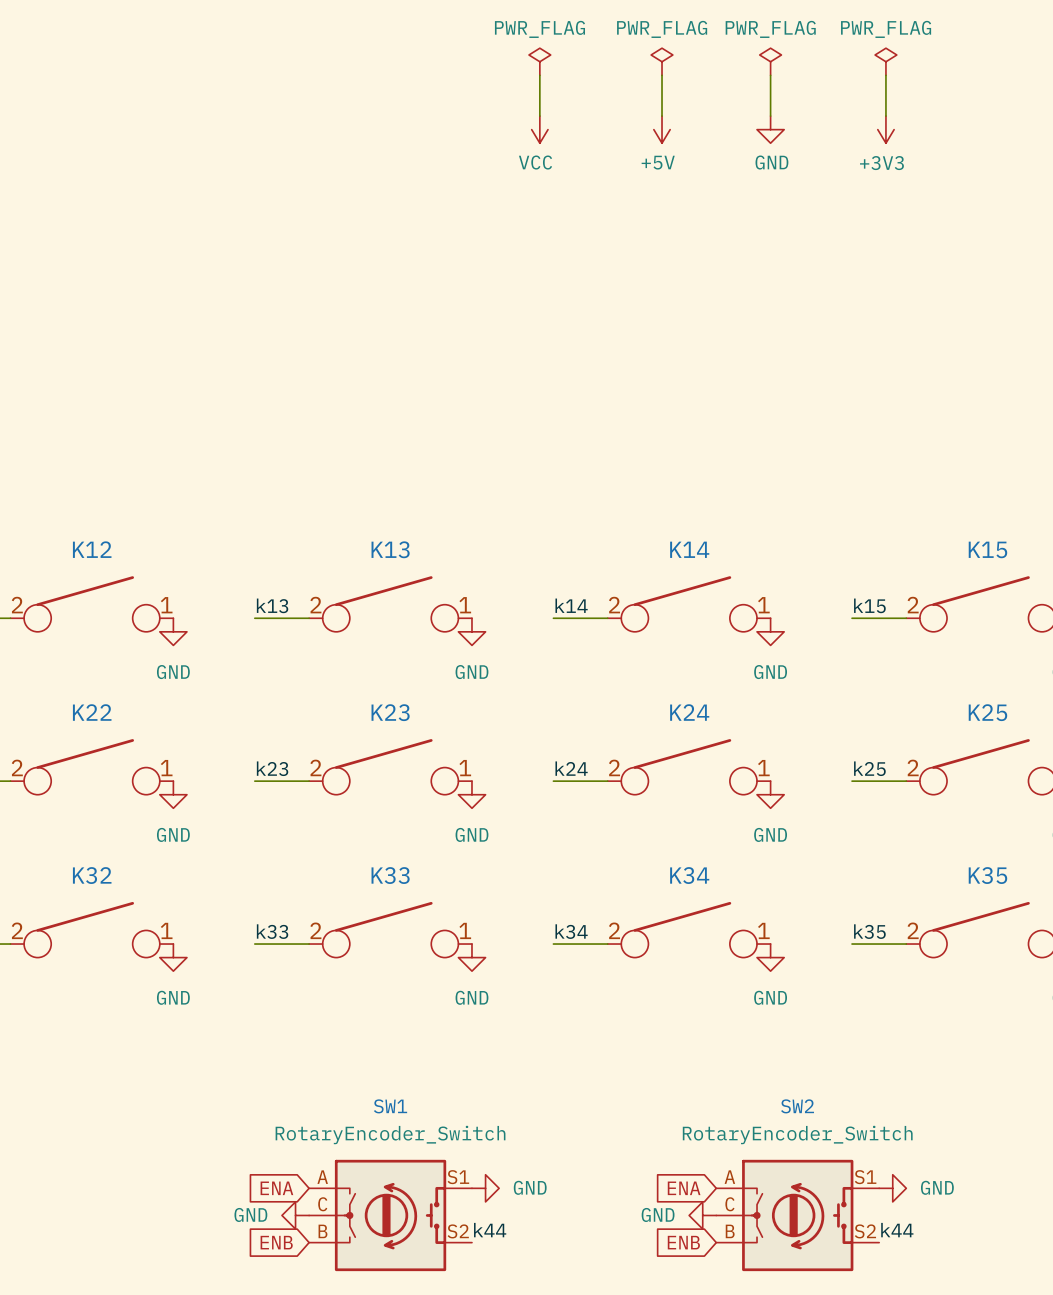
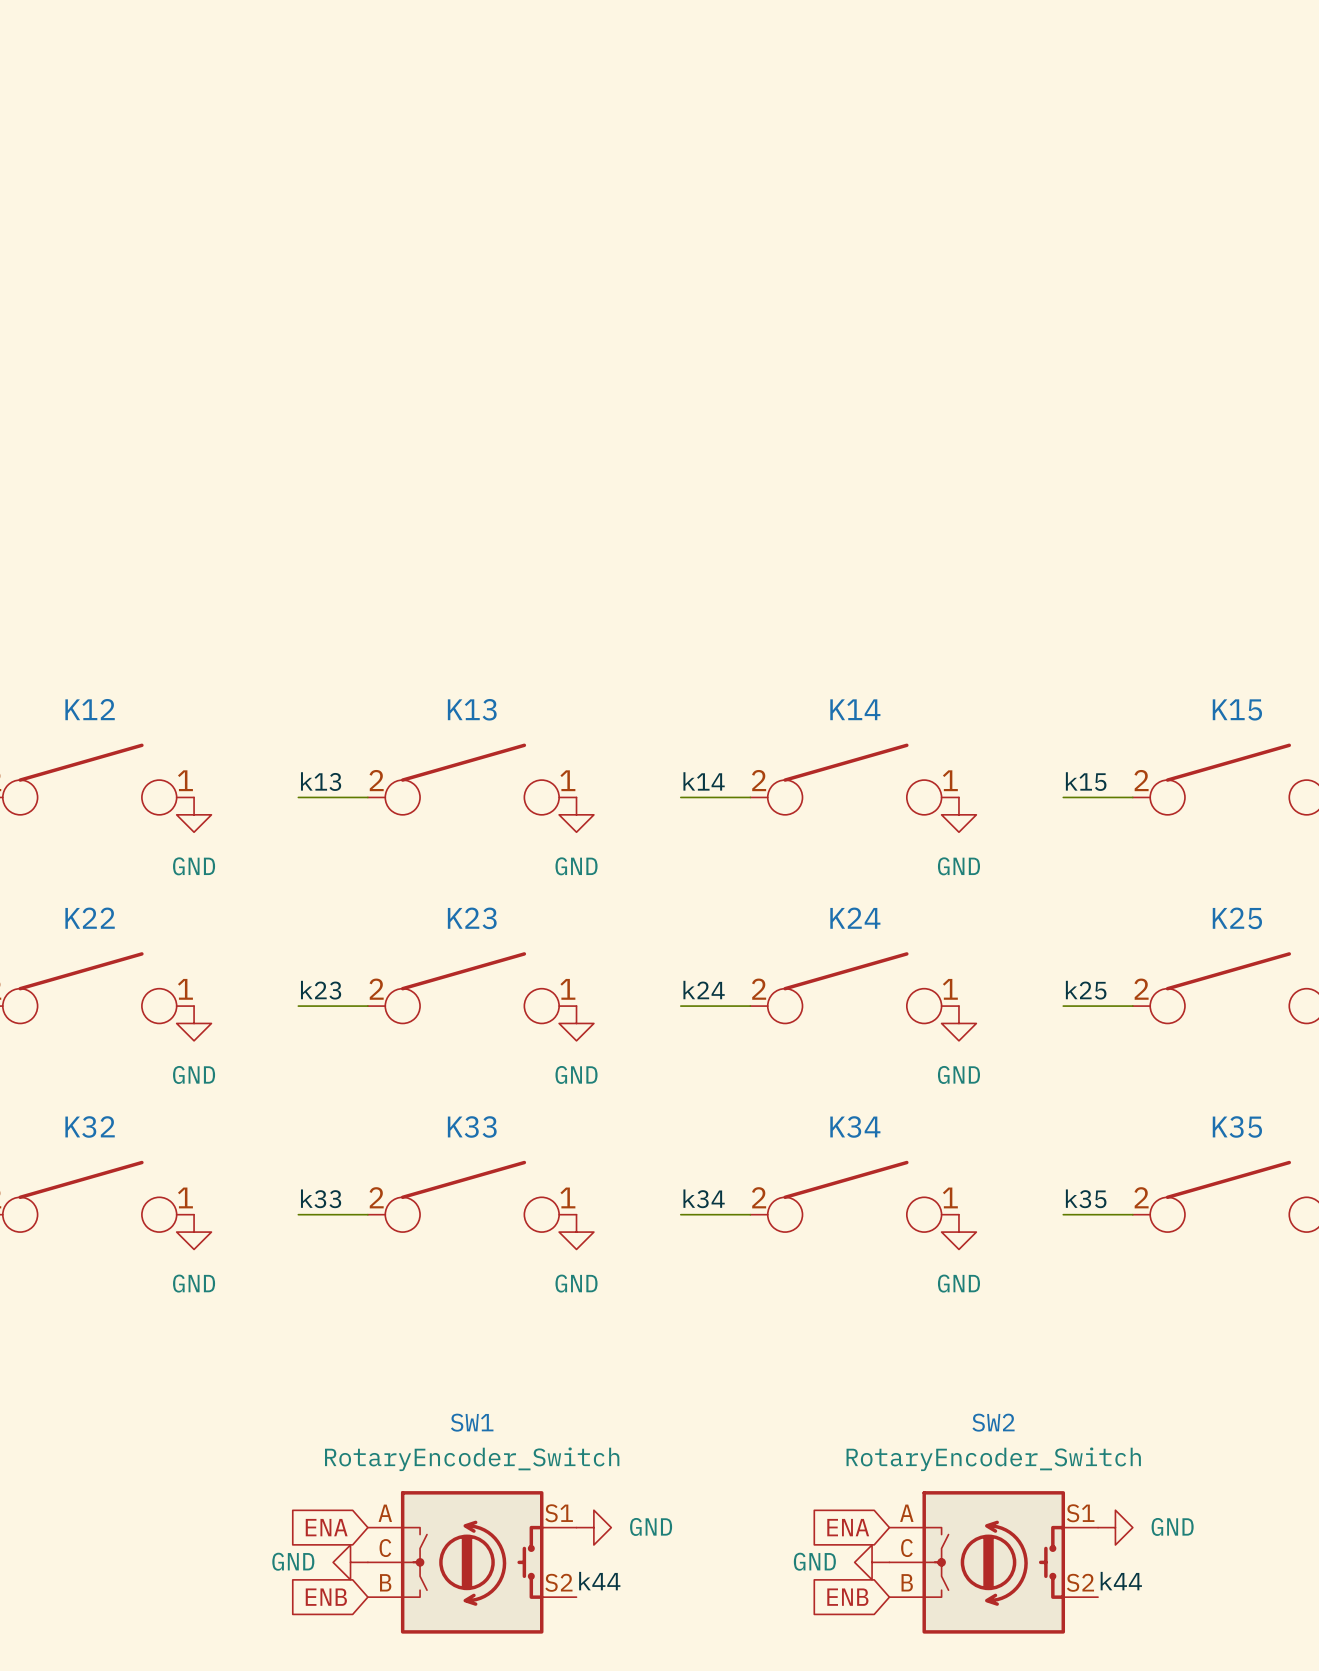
power symbol: PWR_FLAG (539, 61) -> none
power symbol: PWR_FLAG (662, 61) -> none
power symbol: PWR_FLAG (770, 61) -> none
power symbol: PWR_FLAG (885, 61) -> none
wire: (539, 75) (539, 116) -> none
wire: (662, 75) (662, 116) -> none
wire: (770, 75) (770, 116) -> none
wire: (885, 75) (885, 116) -> none
power symbol: VCC (539, 129) -> none
power symbol: +5V (662, 129) -> none
power symbol: GND (770, 129) -> none
power symbol: +3V3 (885, 129) -> none

